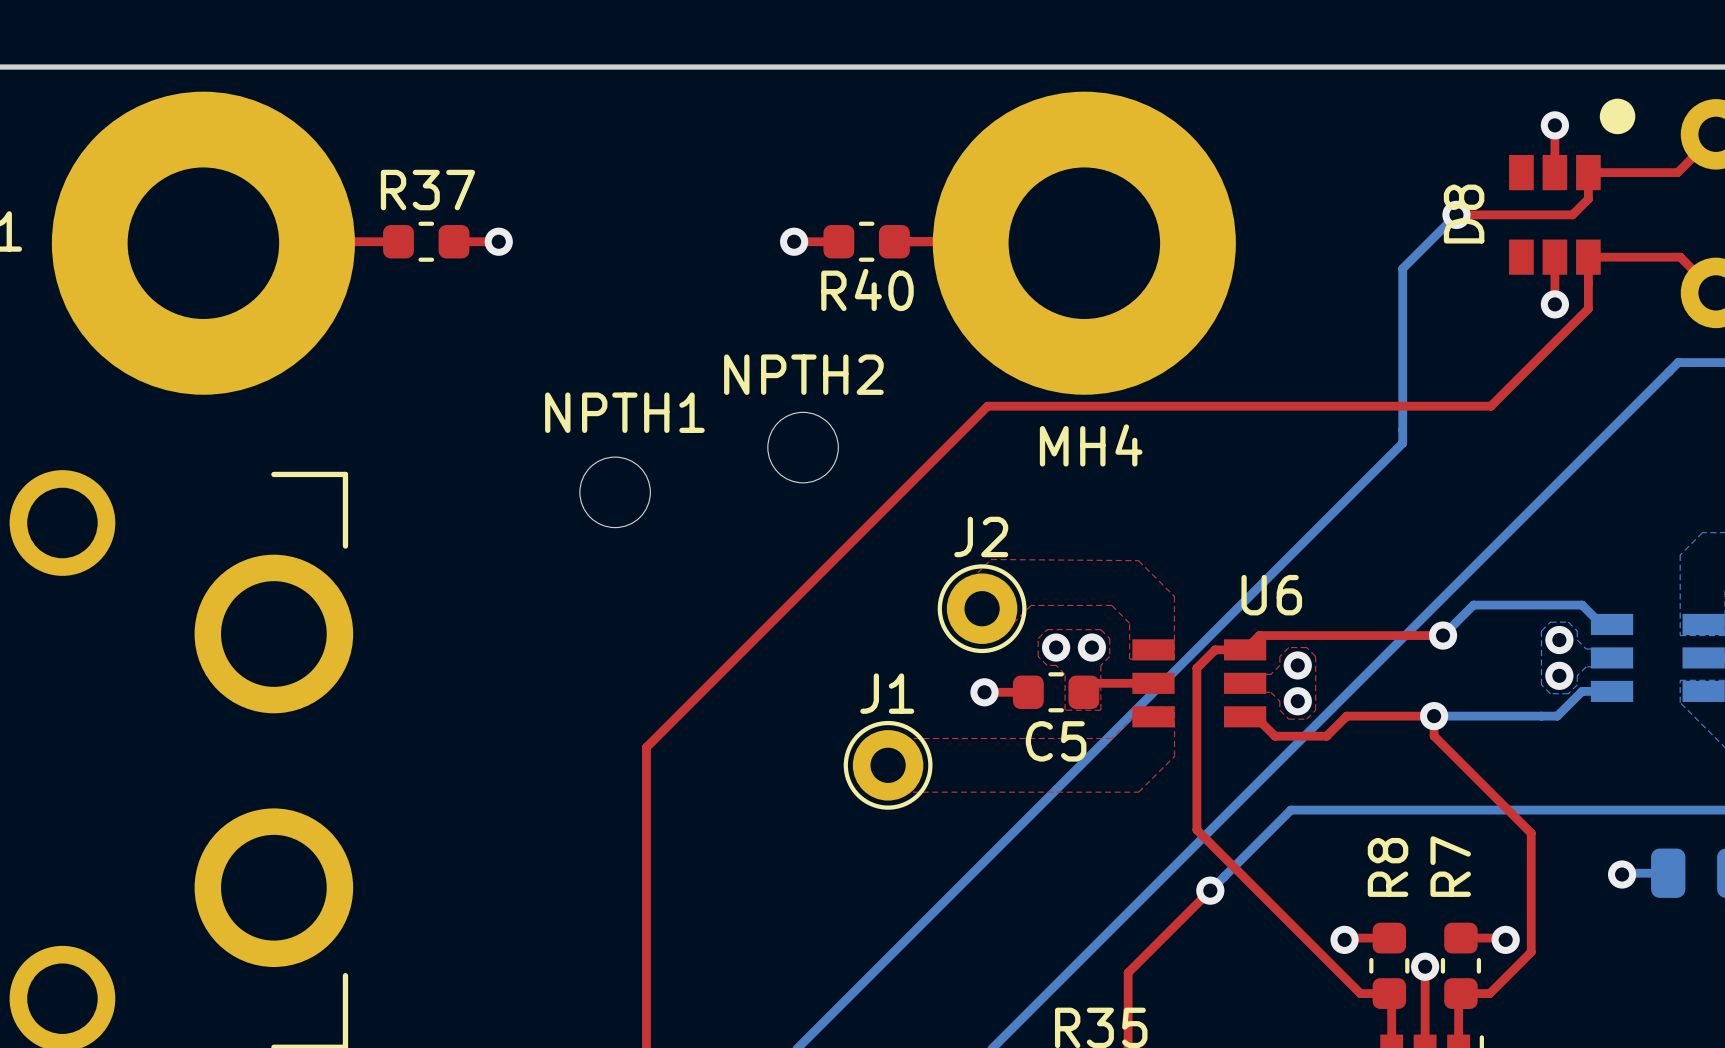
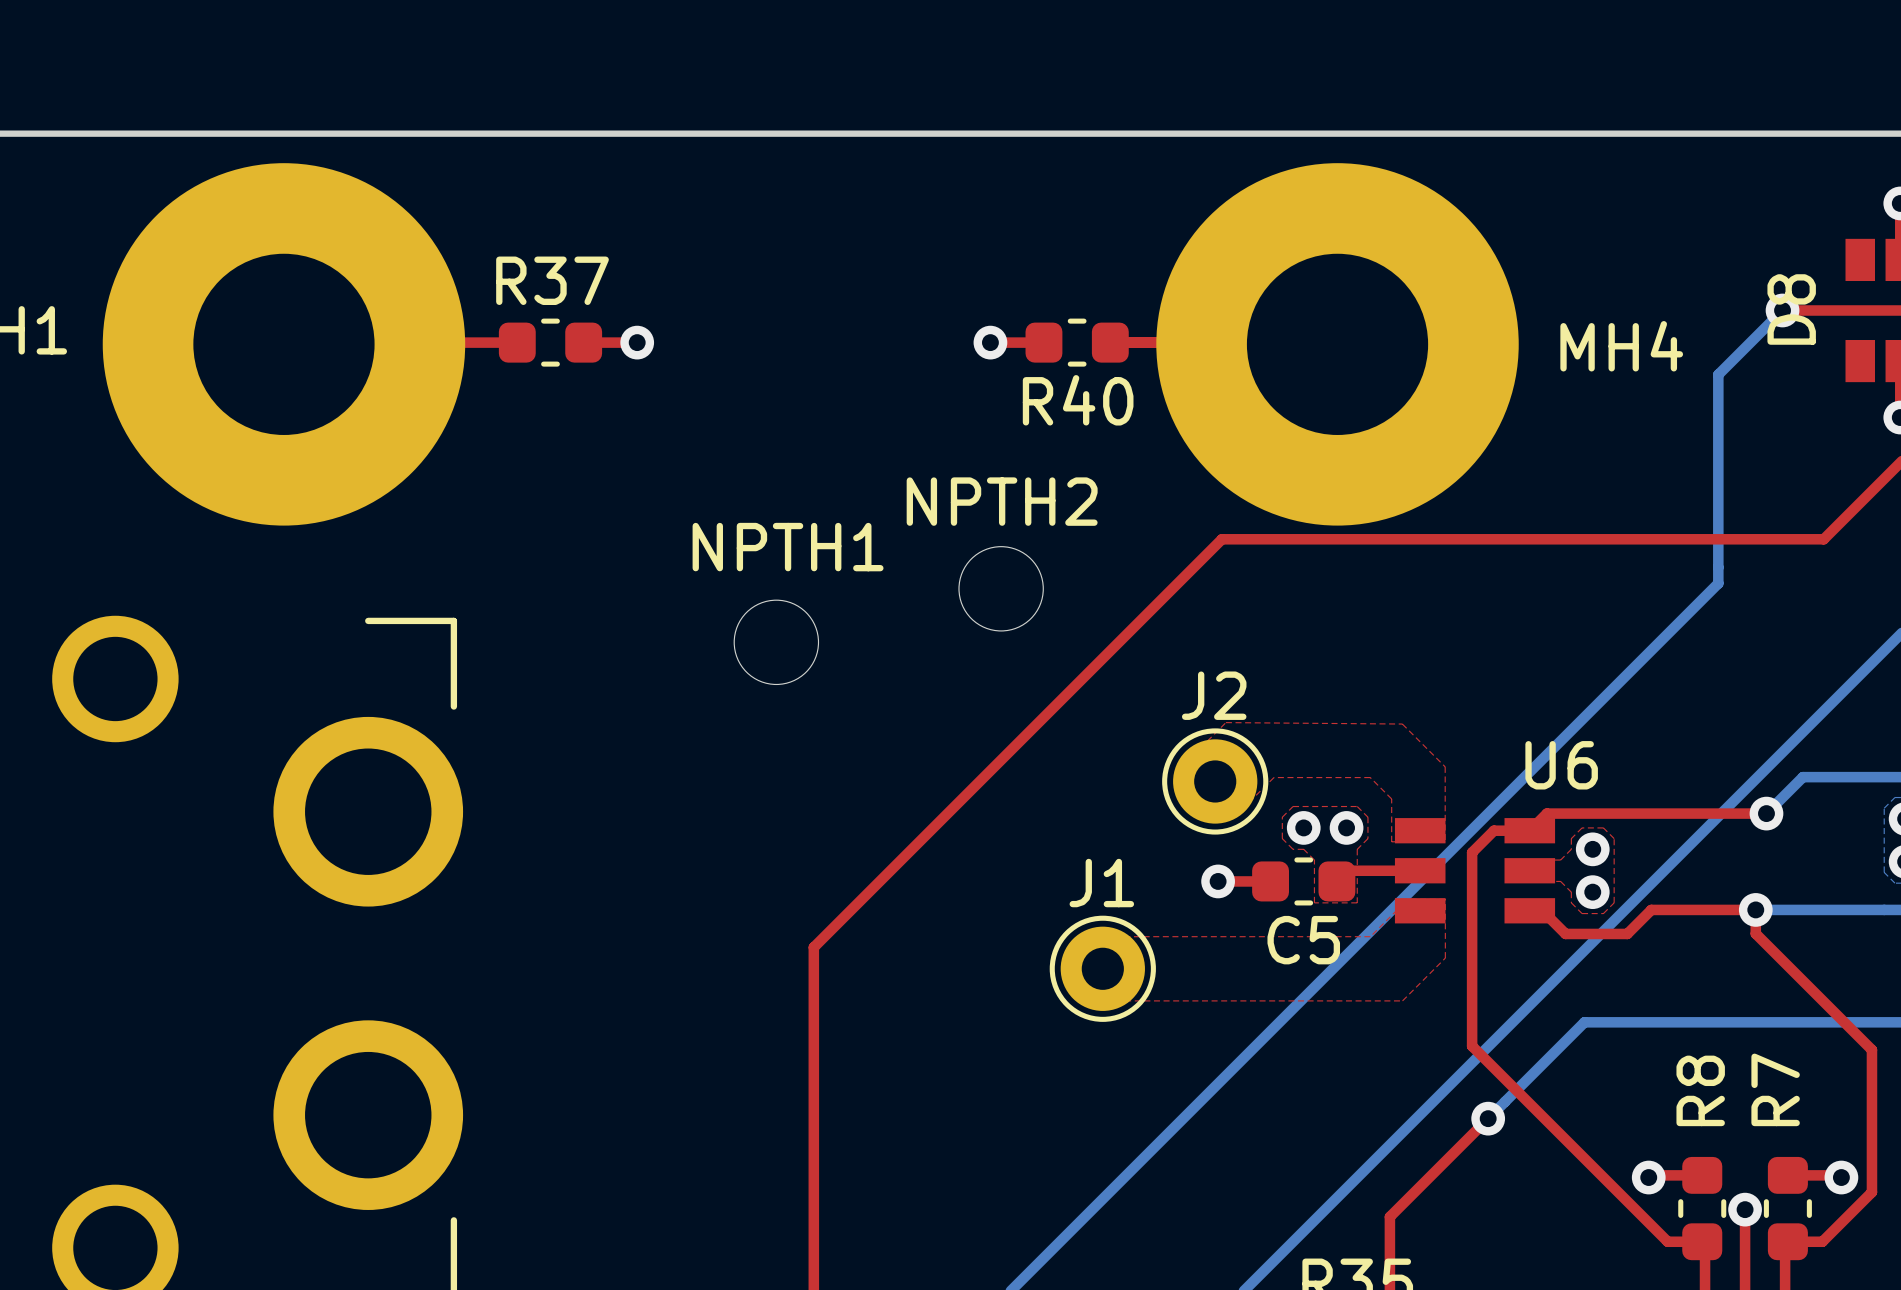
MH4 name position: MH4 (1091, 445) -> MH4 (1621, 346)

